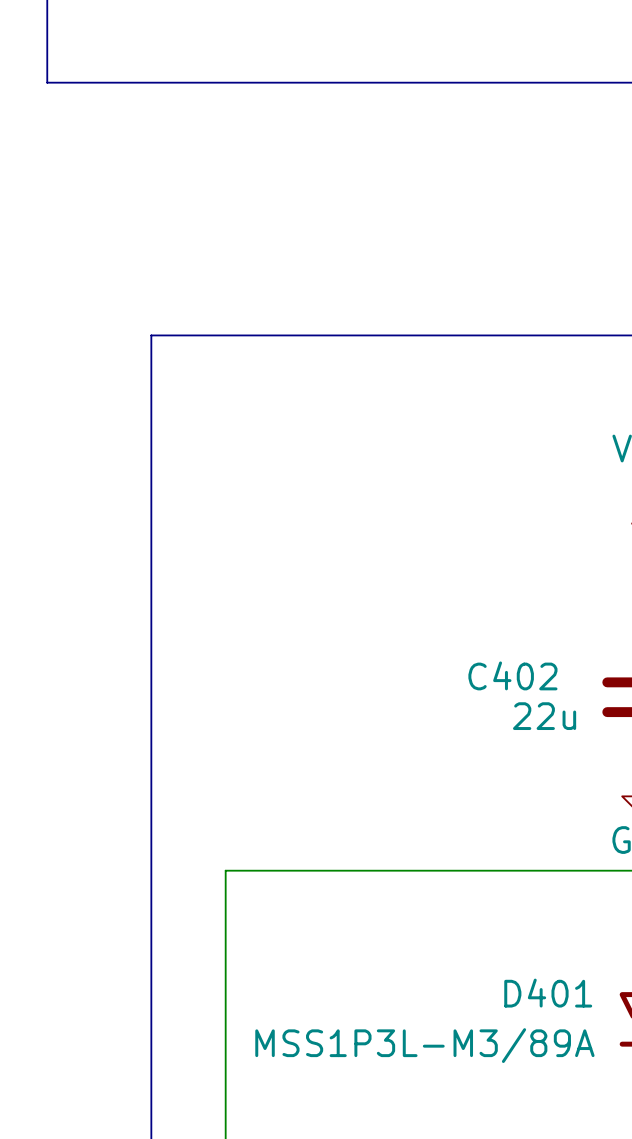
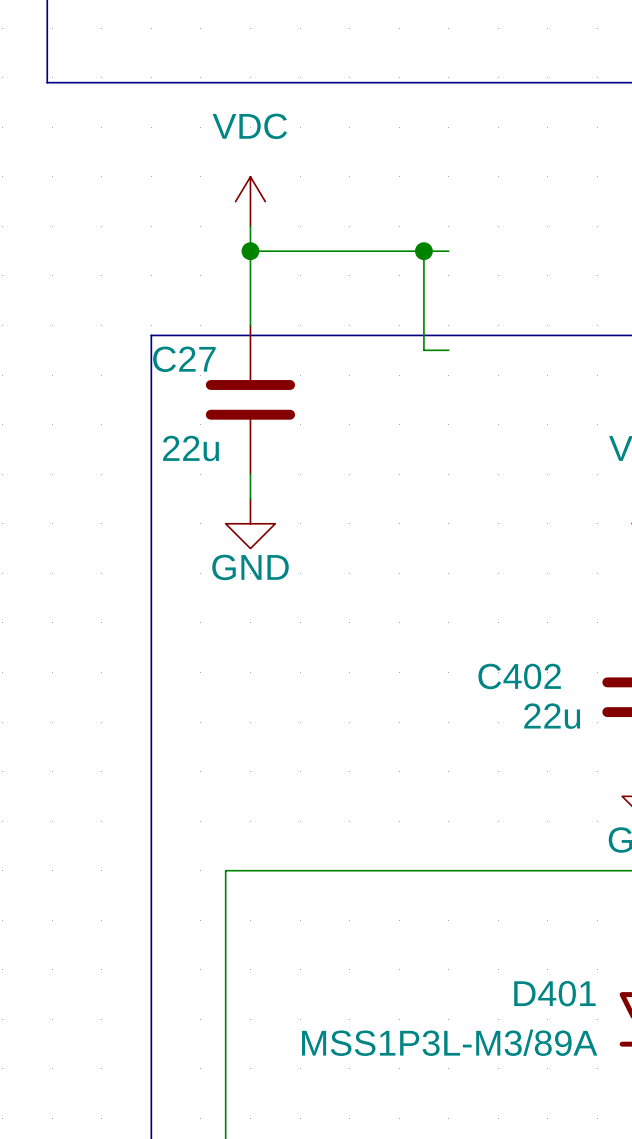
power symbol: none -> VDC (250, 201)
wire: none -> (250, 226) (250, 325)
wire: none -> (250, 251) (448, 251)
junction: none -> (250, 251)
wire: none -> (423, 251) (423, 350) (448, 350)
junction: none -> (423, 251)
C27: none -> 22u (250, 399)
wire: none -> (250, 474) (250, 498)
power symbol: none -> GND (250, 523)

